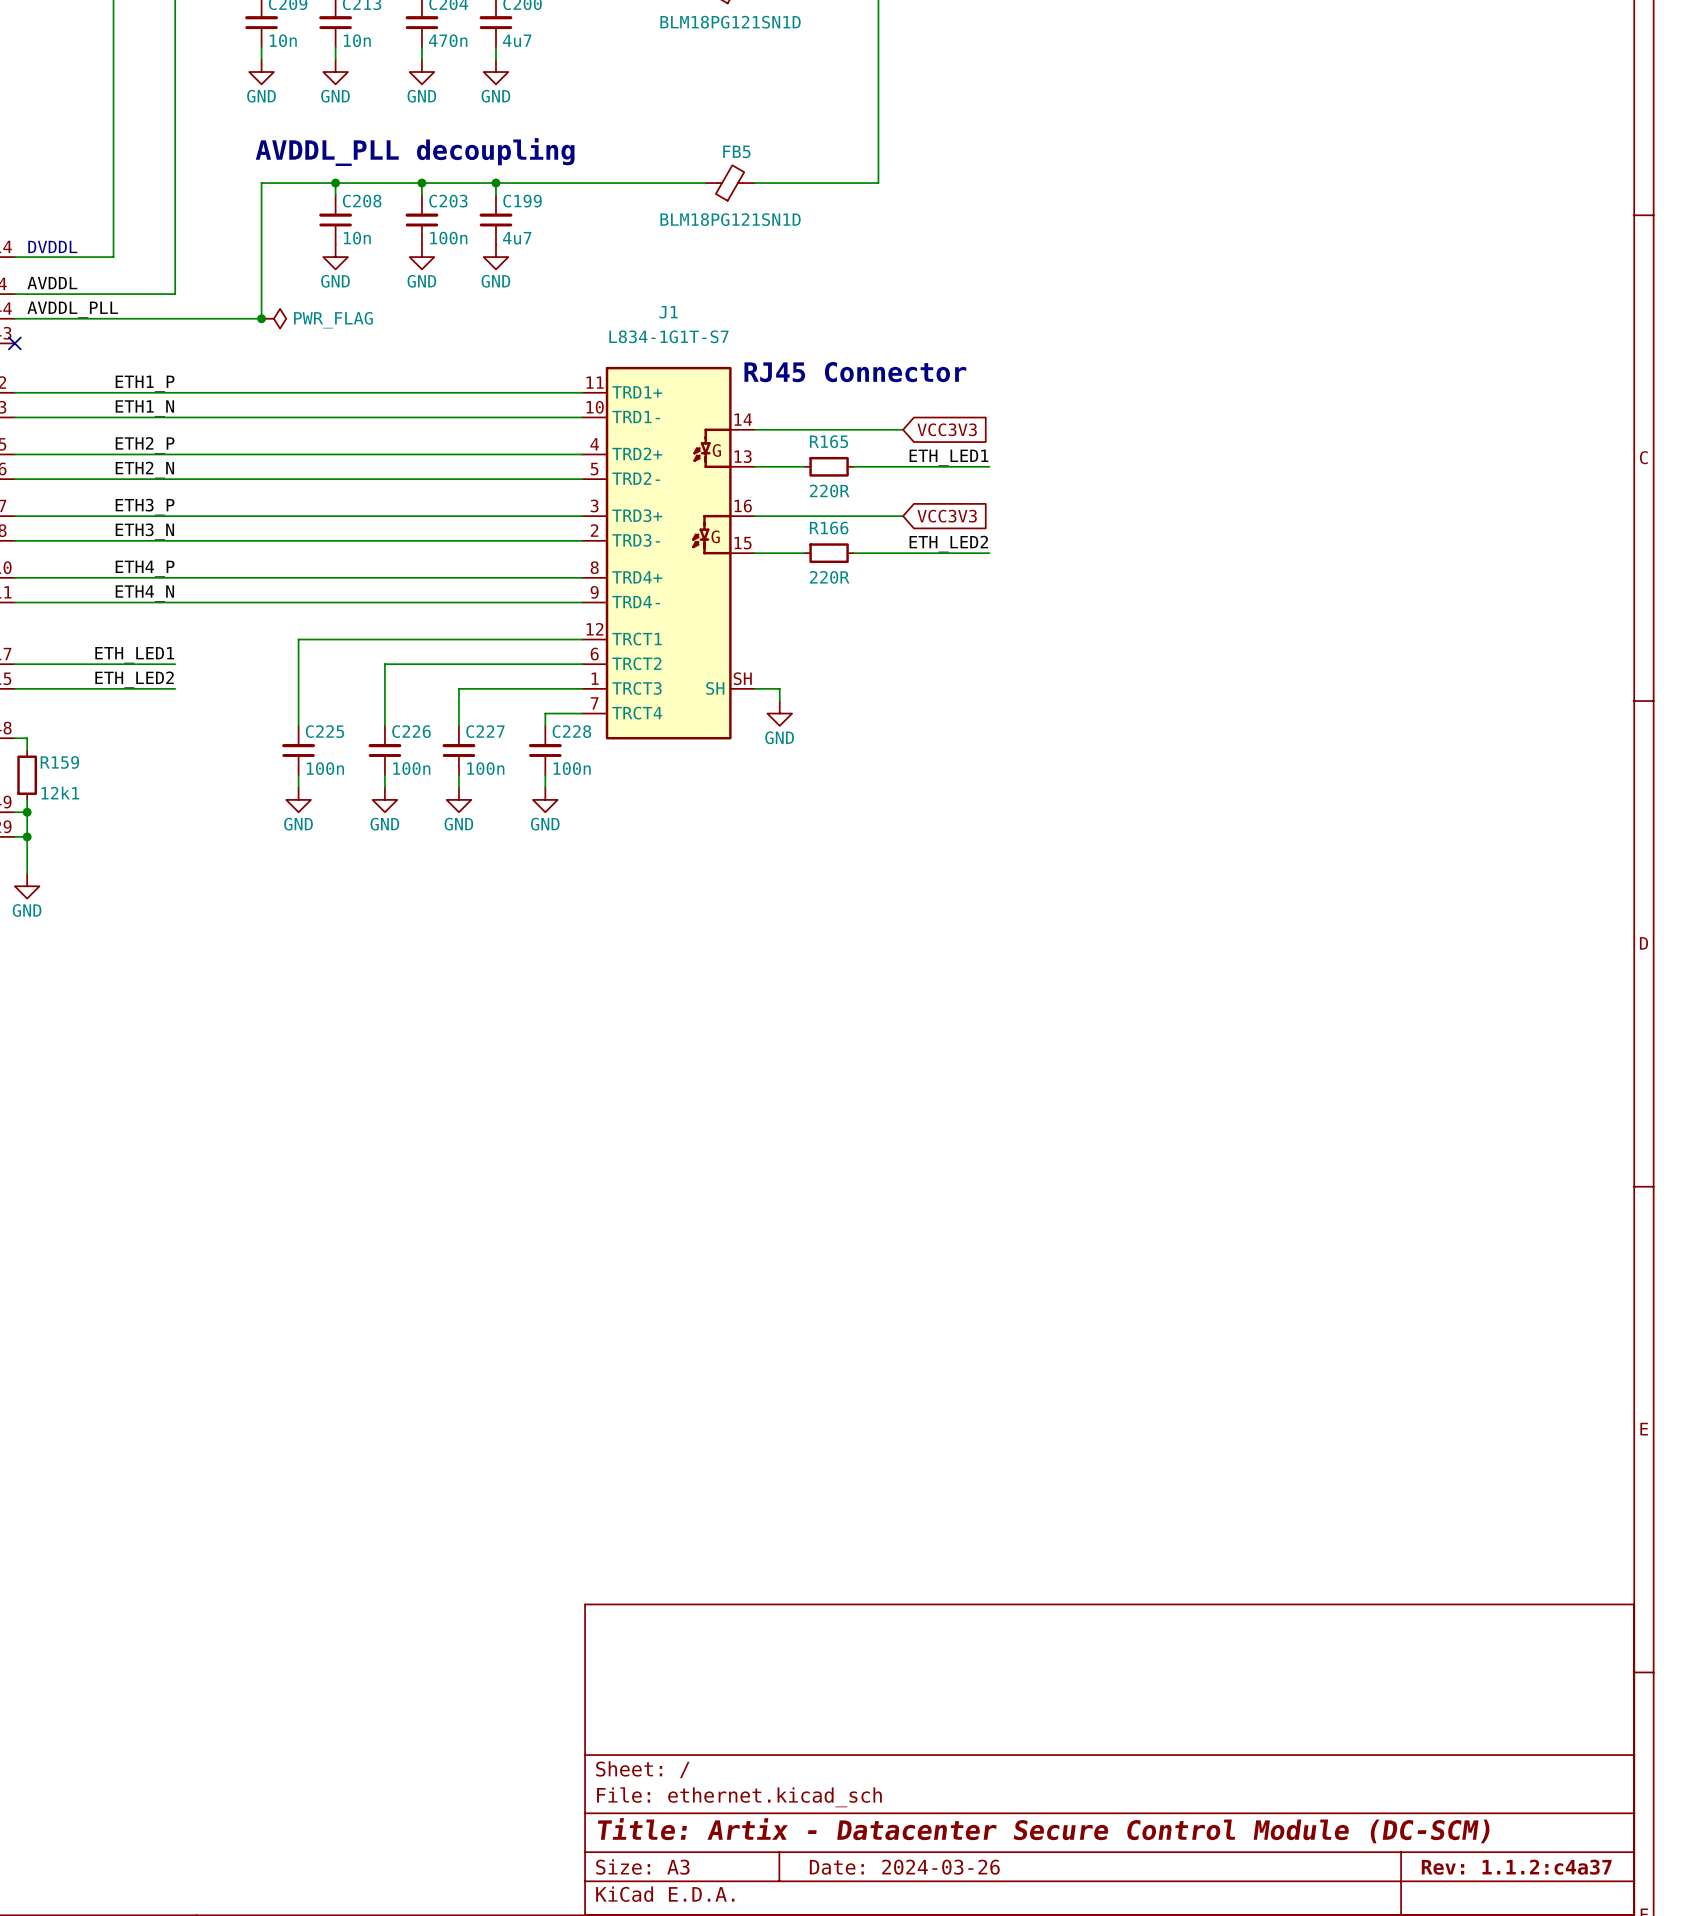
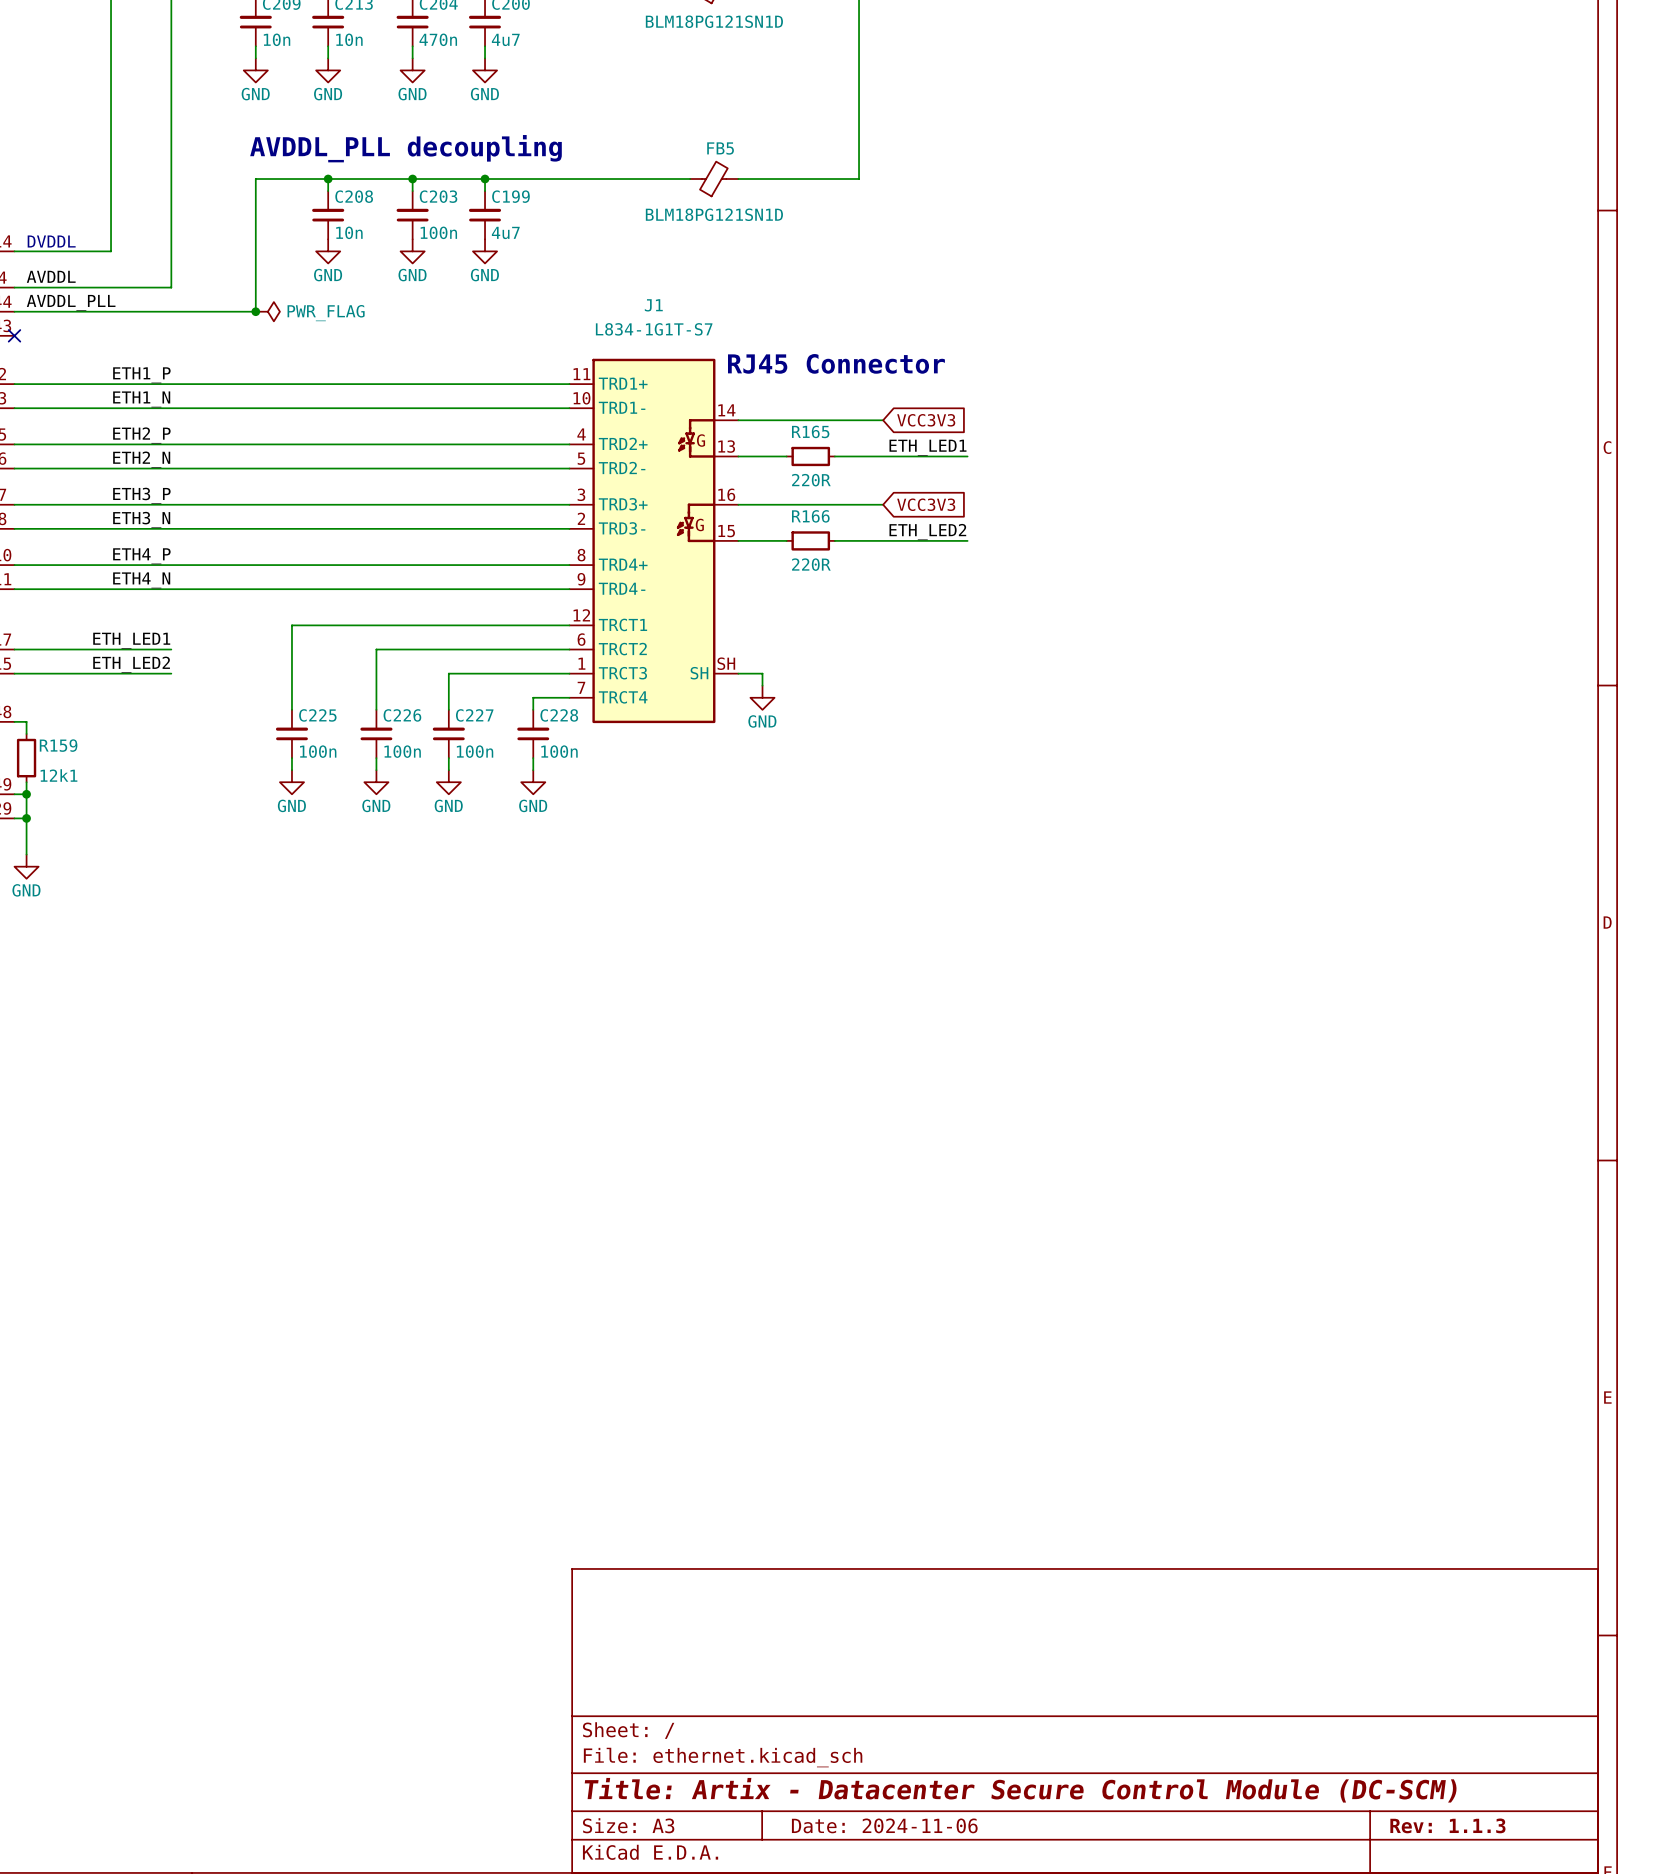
title block: Date: 2024-03-26 (904, 1867) -> Date: 2024-11-06 (884, 1825)
title block: Rev: 1.1.2:c4a37 (1516, 1867) -> Rev: 1.1.3 (1447, 1825)

